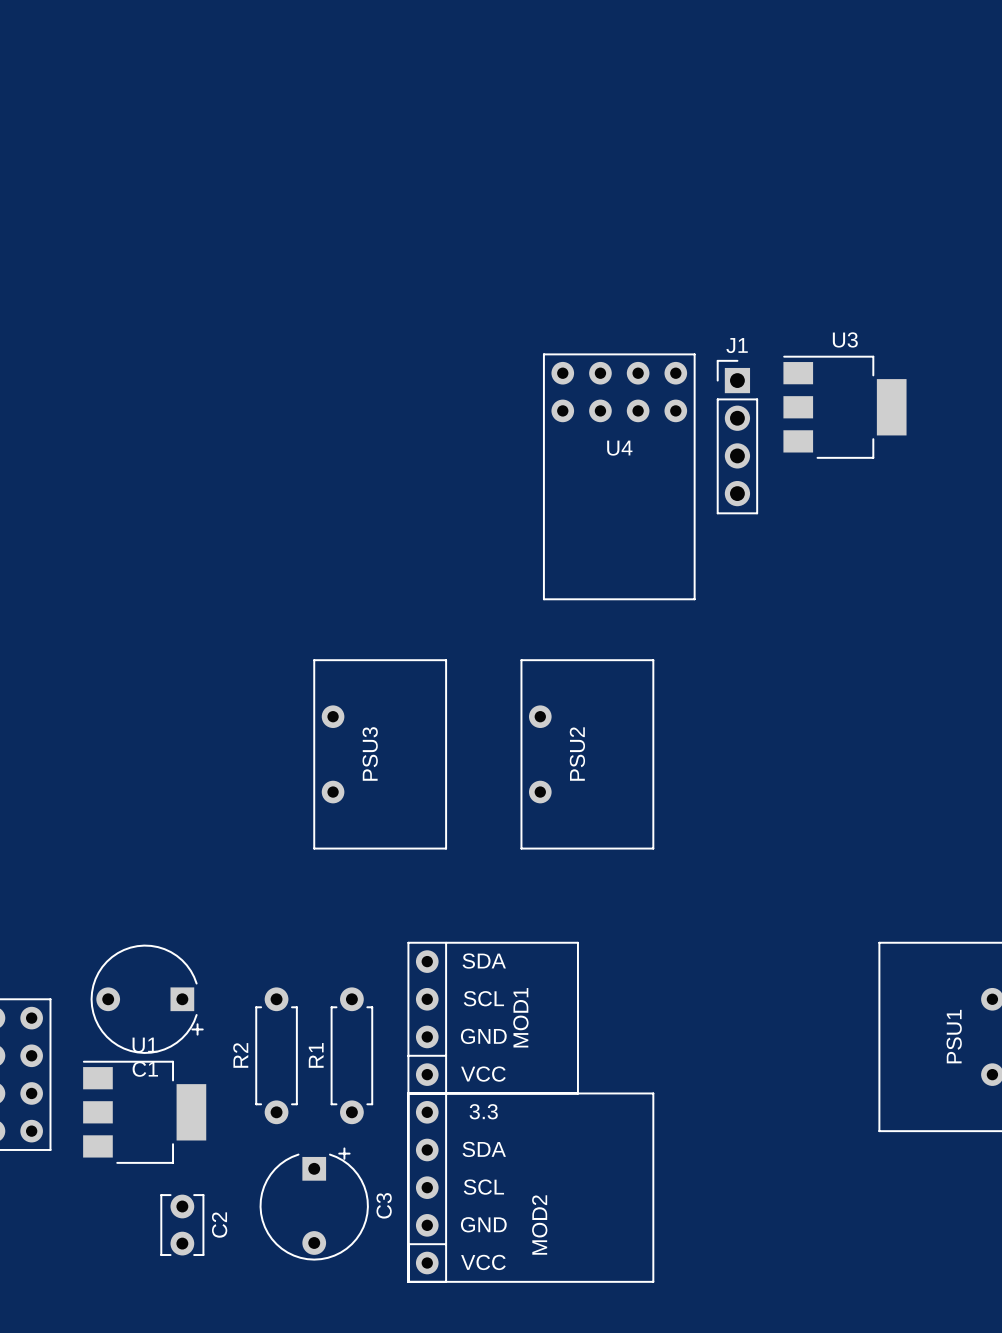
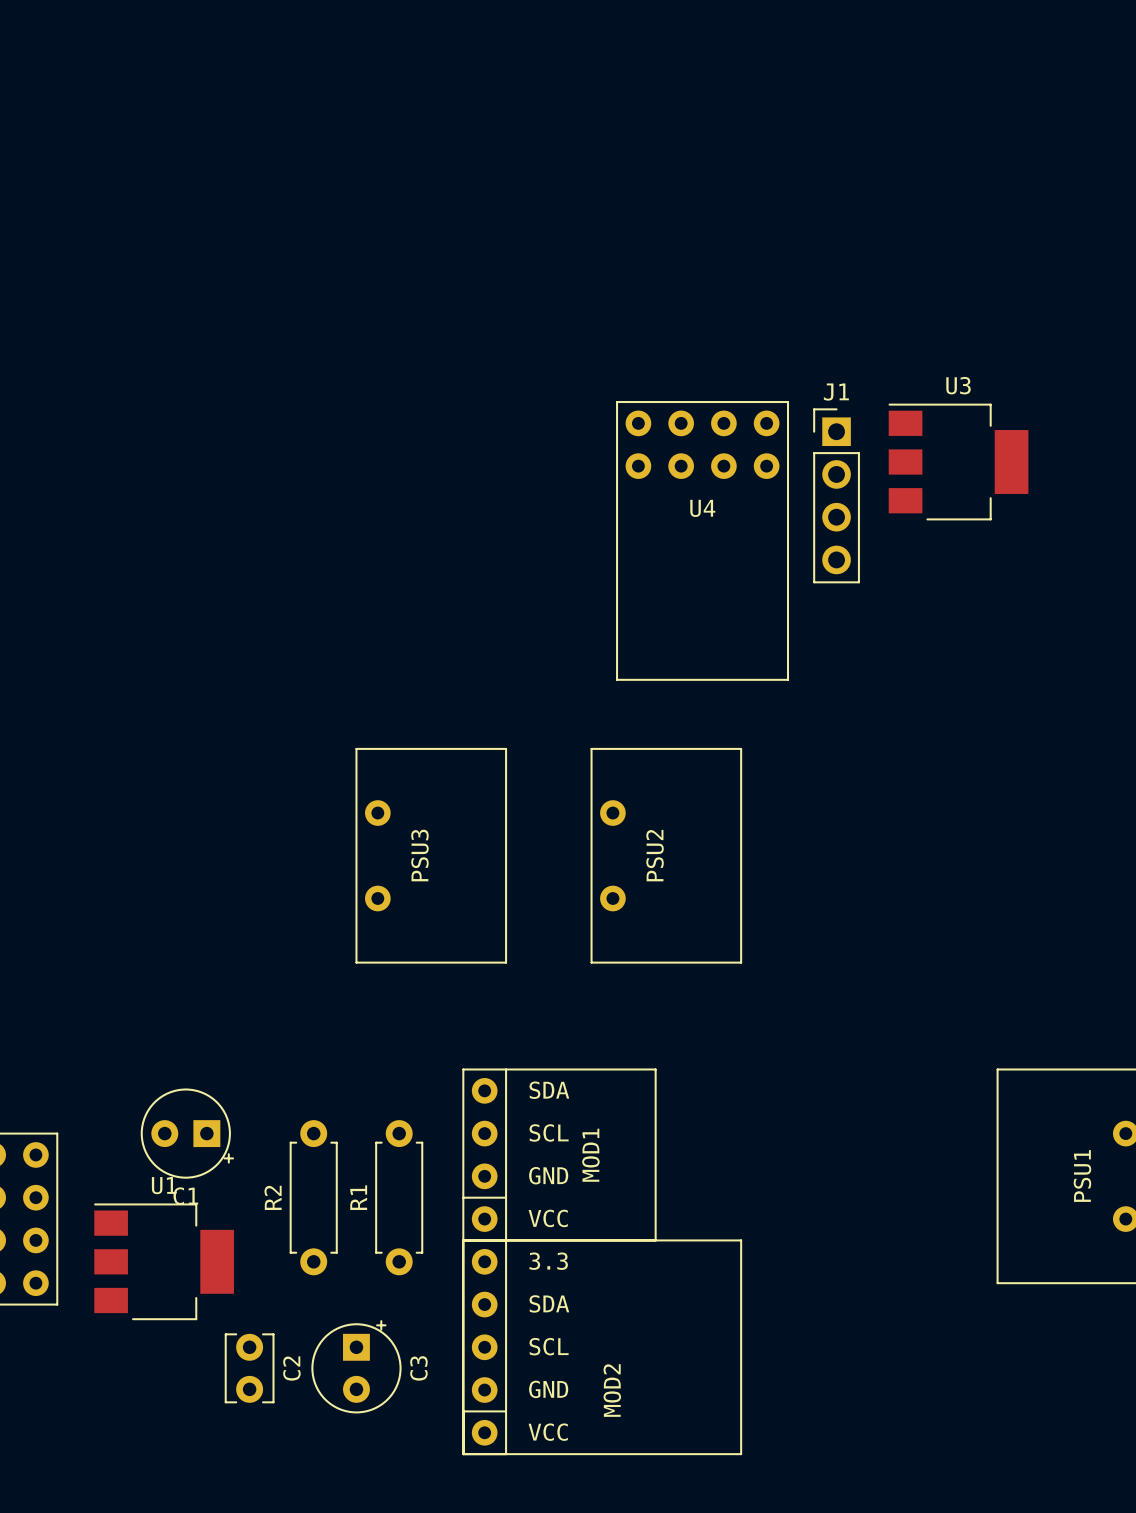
C1 footprint: [90, 944, 204, 1054] -> [140, 1088, 235, 1179]
C3 footprint: [259, 1147, 369, 1261] -> [311, 1320, 402, 1414]
C2 position: (182, 1225) -> (249, 1368)

